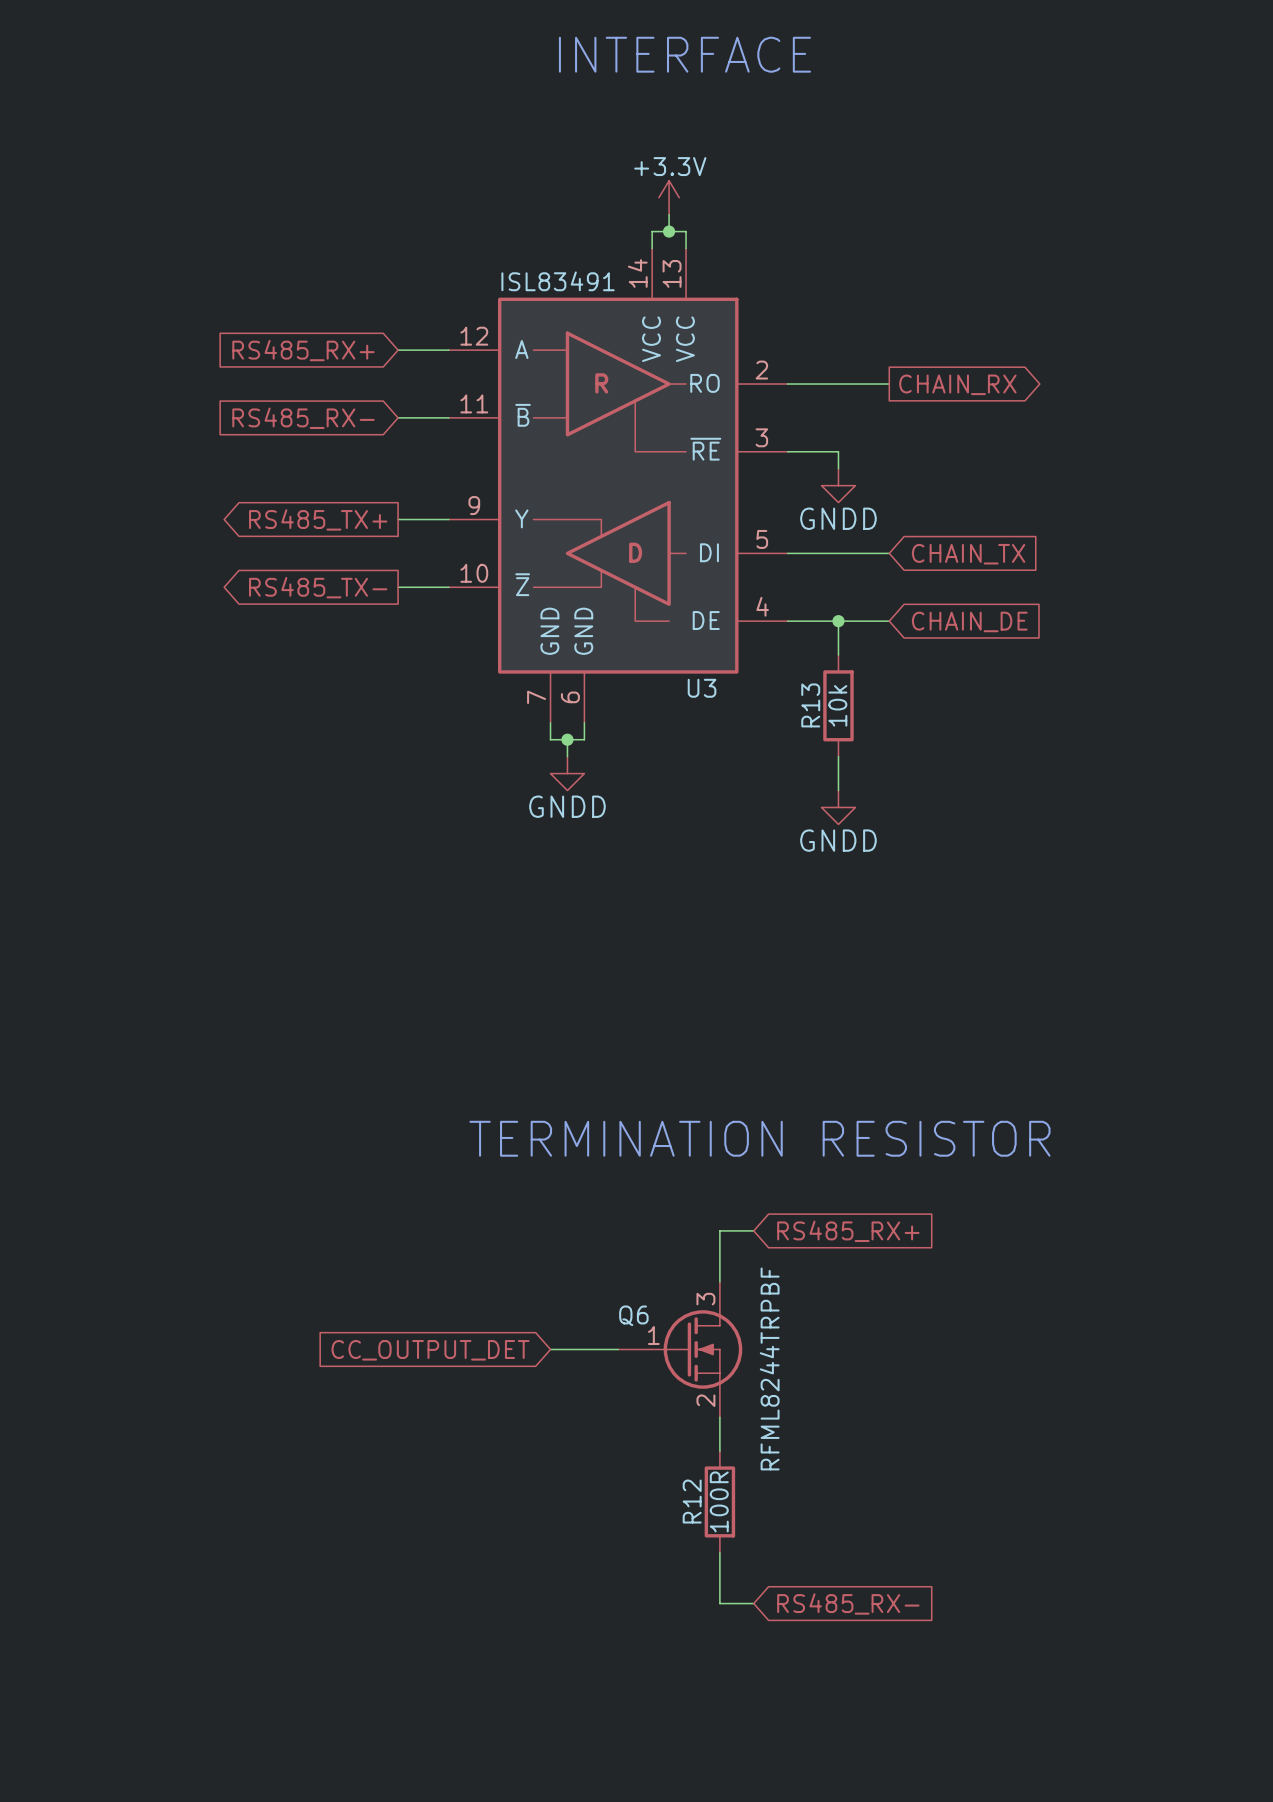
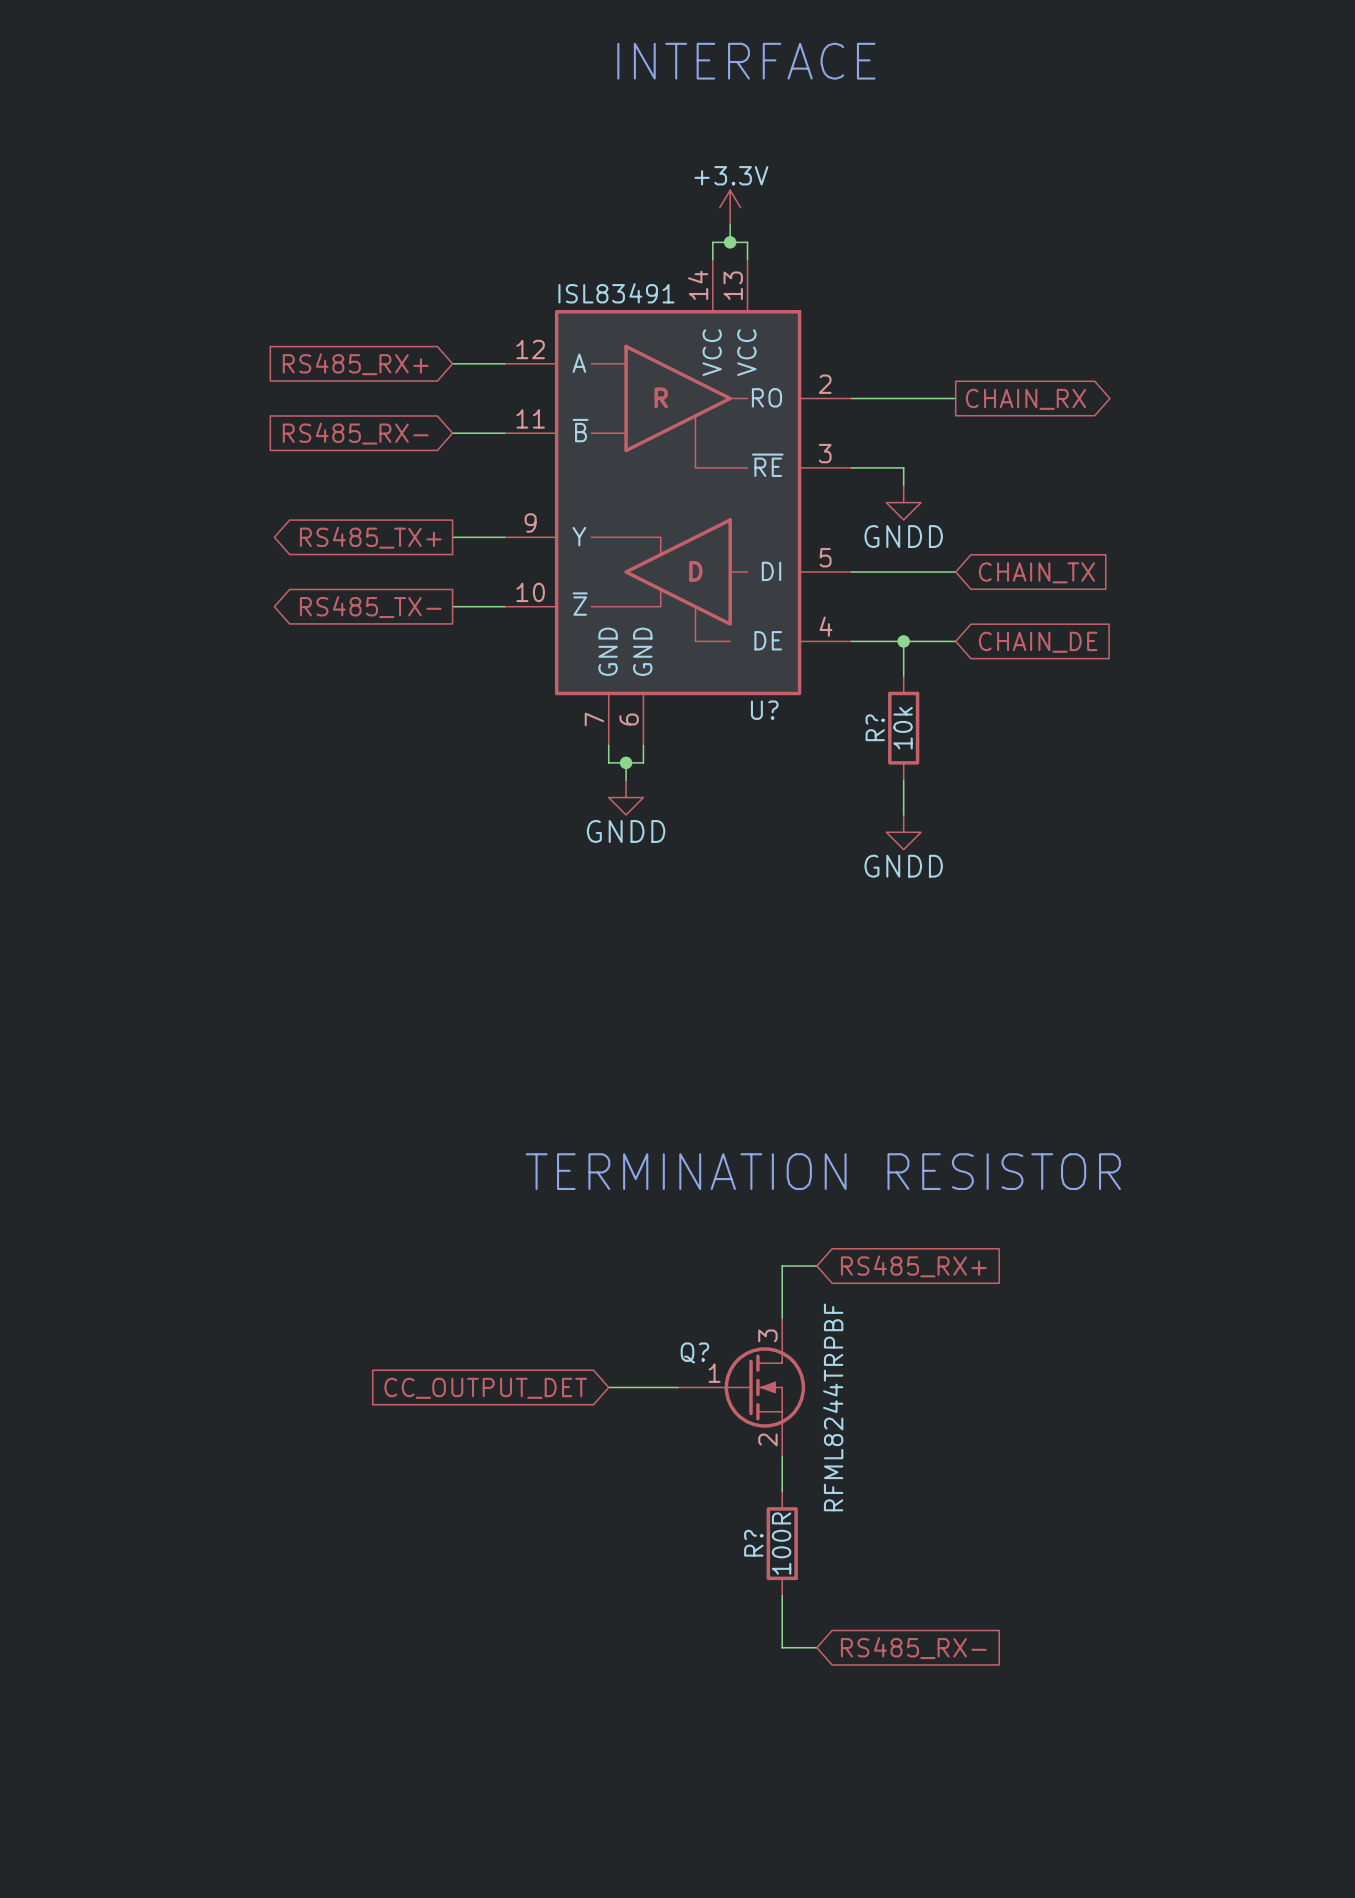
U3 name: U3 (702, 688) -> U? (764, 710)
R13 name: R13 (810, 705) -> R? (875, 727)
Q6 name: Q6 (633, 1315) -> Q? (694, 1352)
R12 name: R12 (692, 1501) -> R? (753, 1543)

